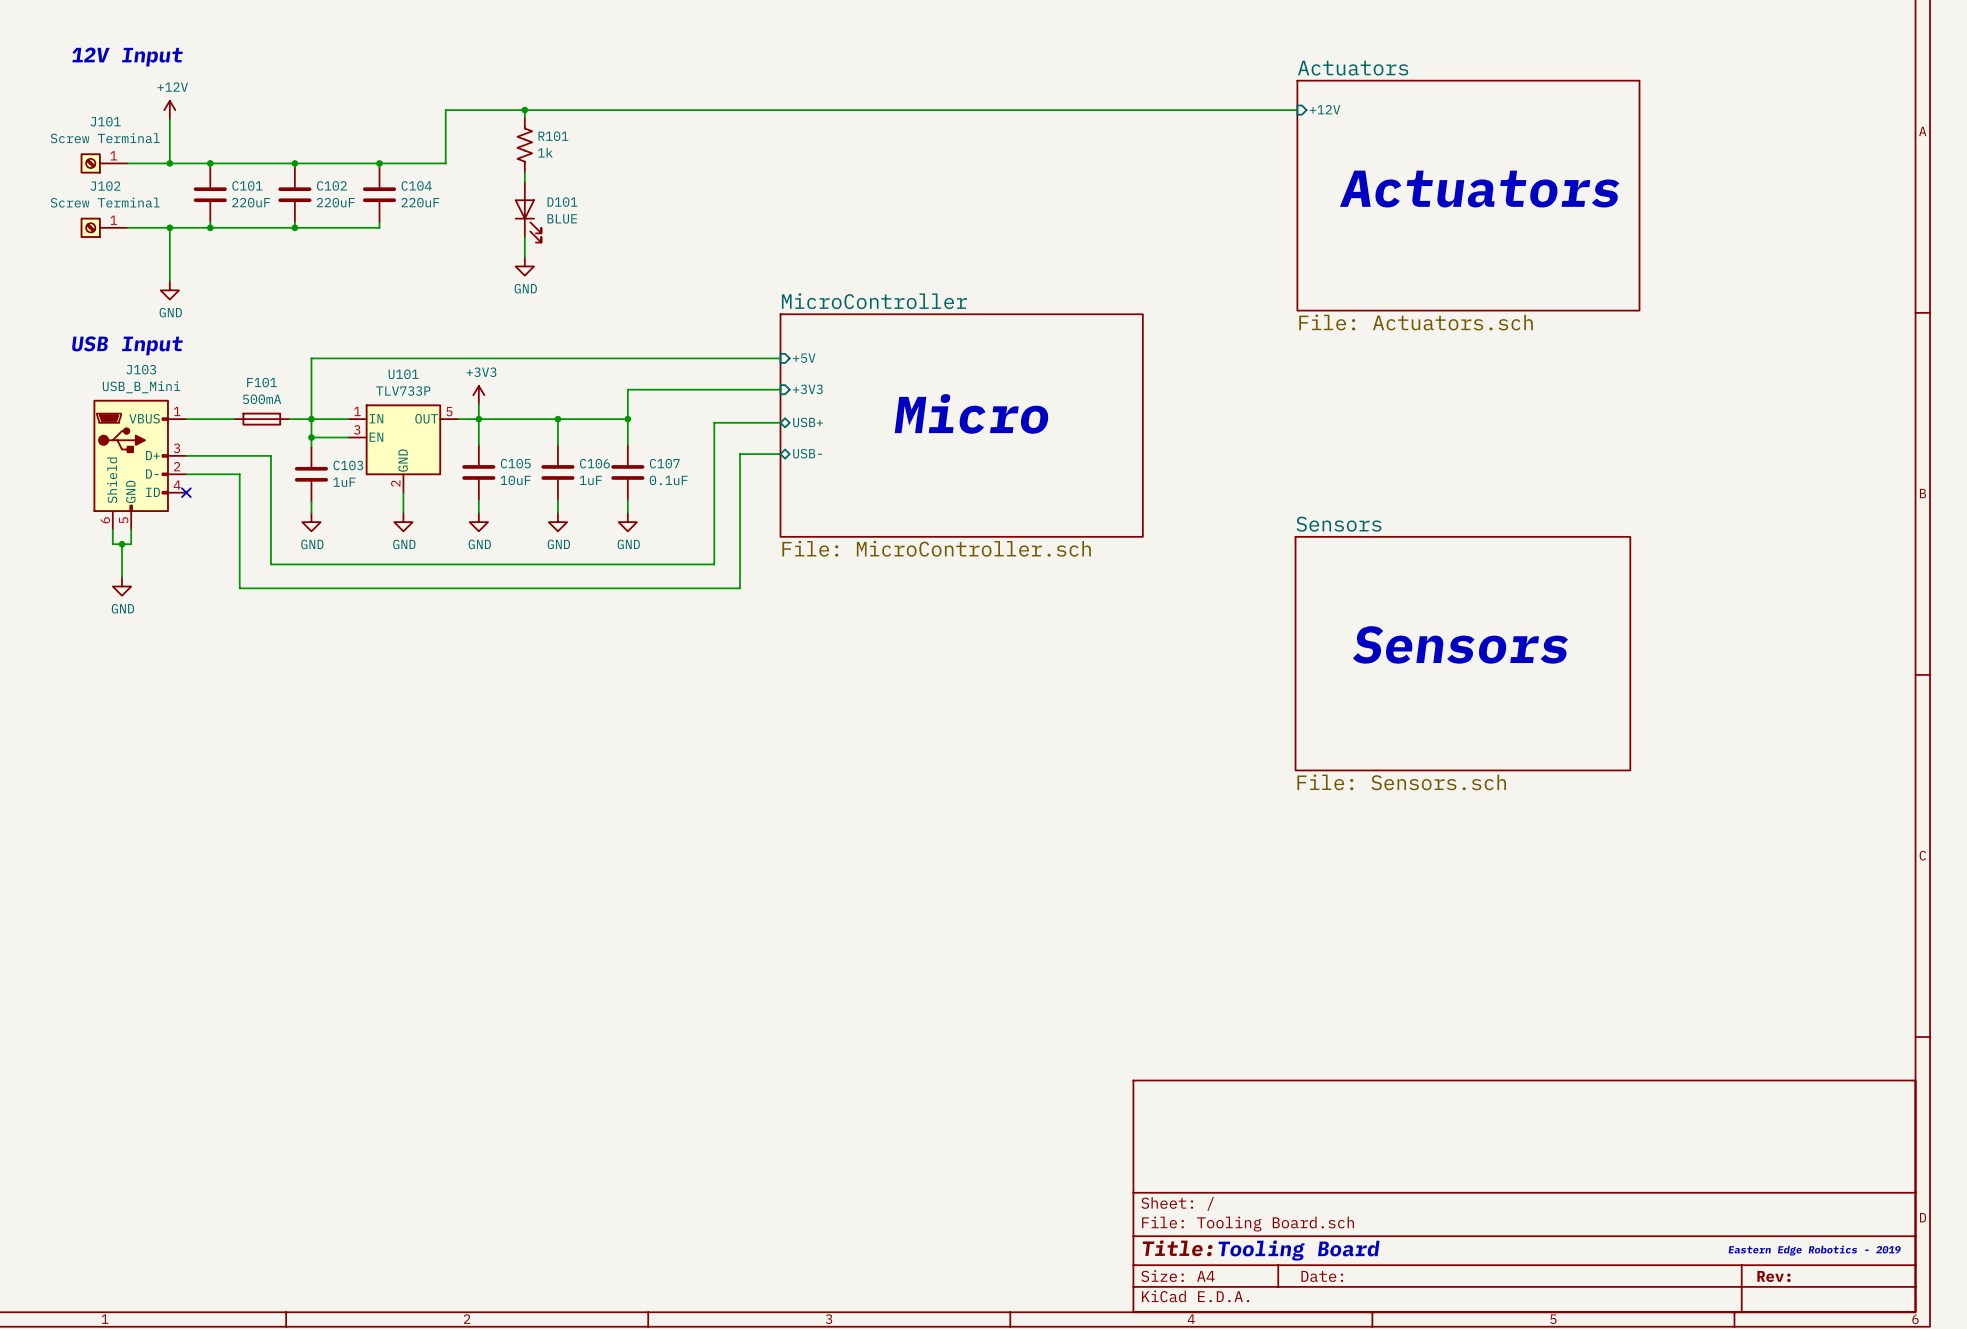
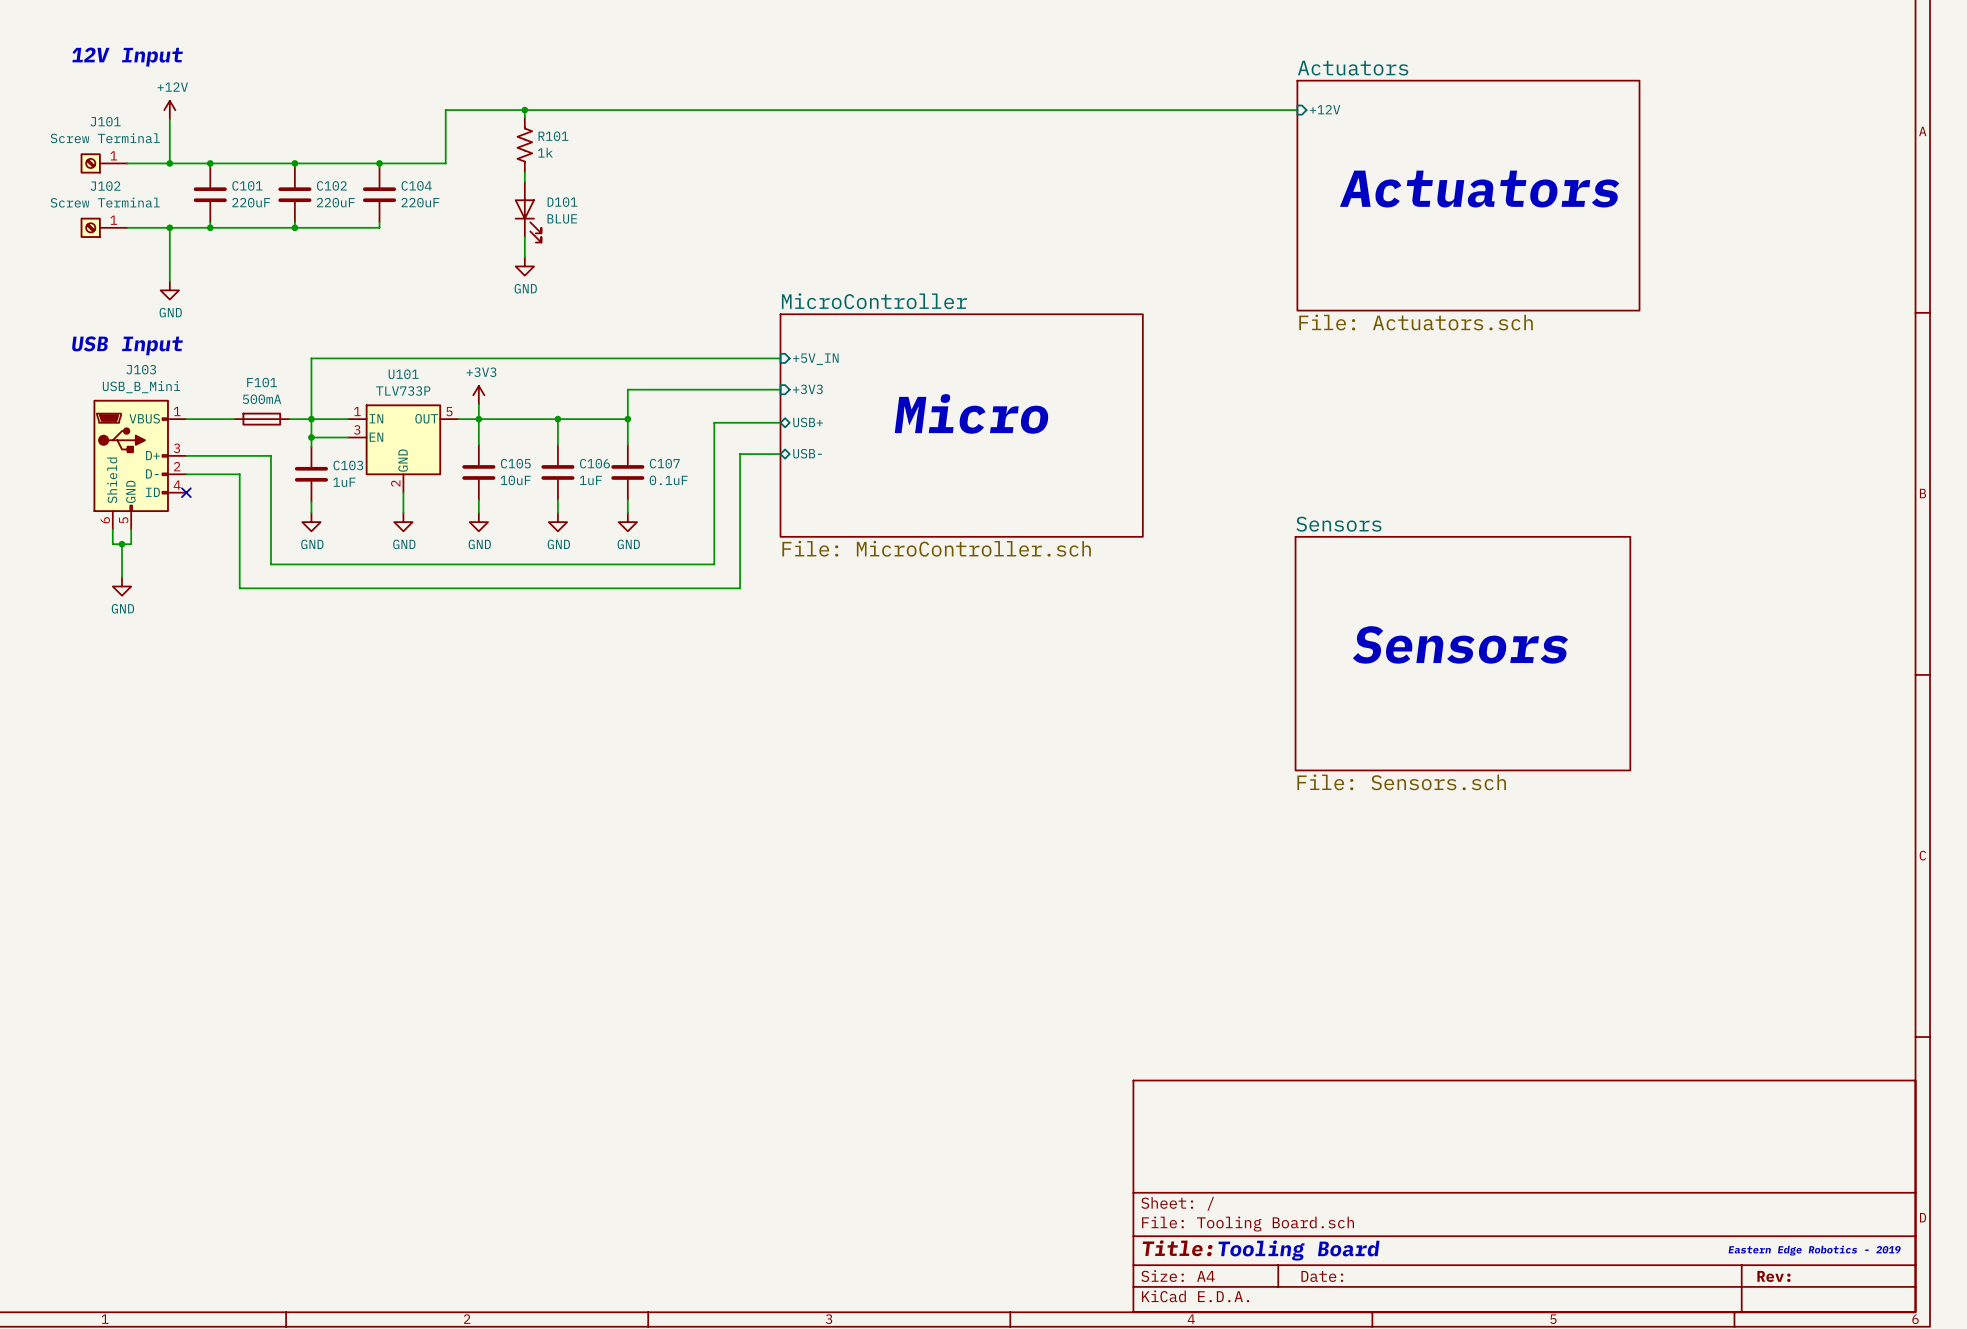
sheet pin: +5V (804, 358) -> +5V_IN (815, 359)

